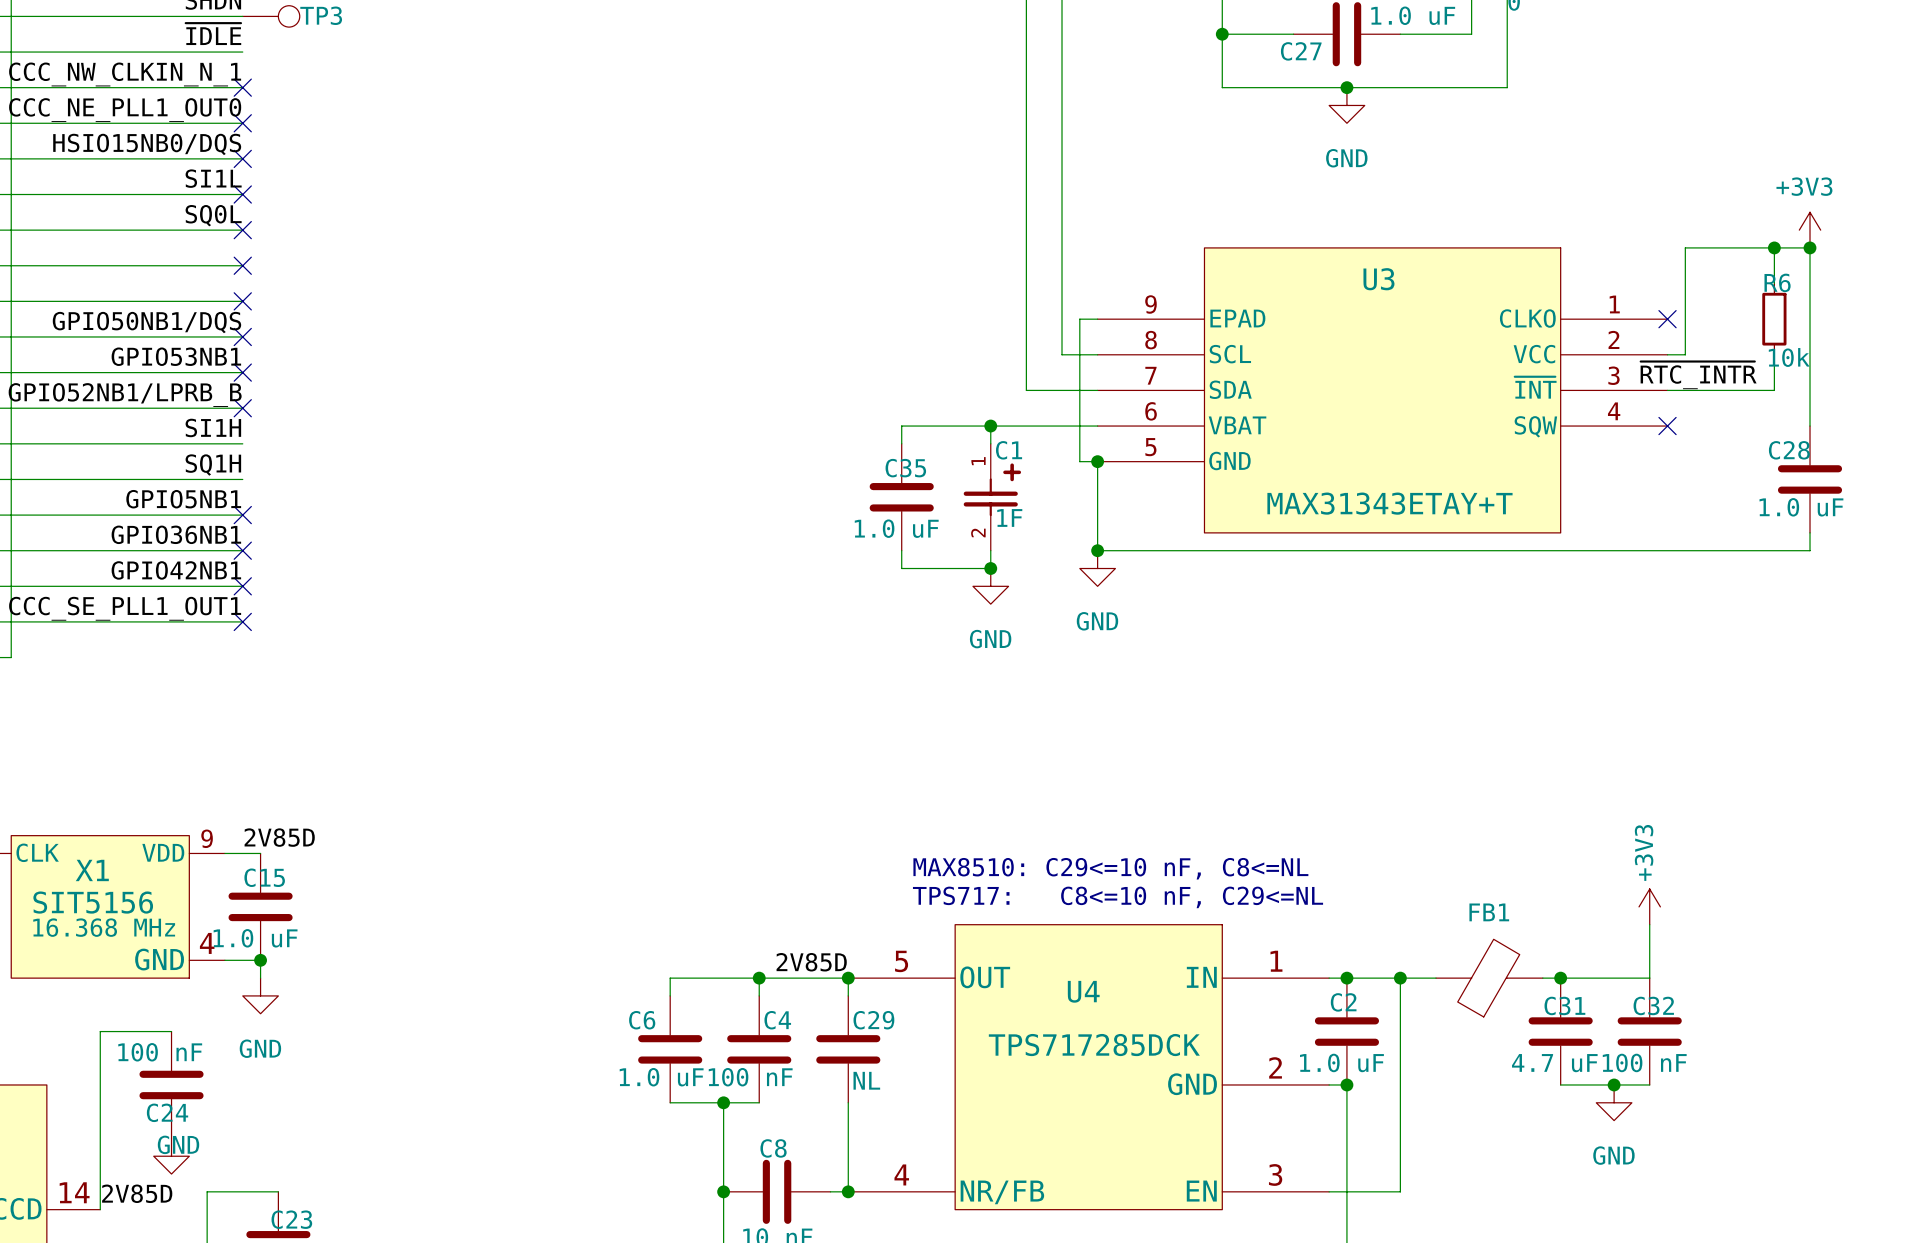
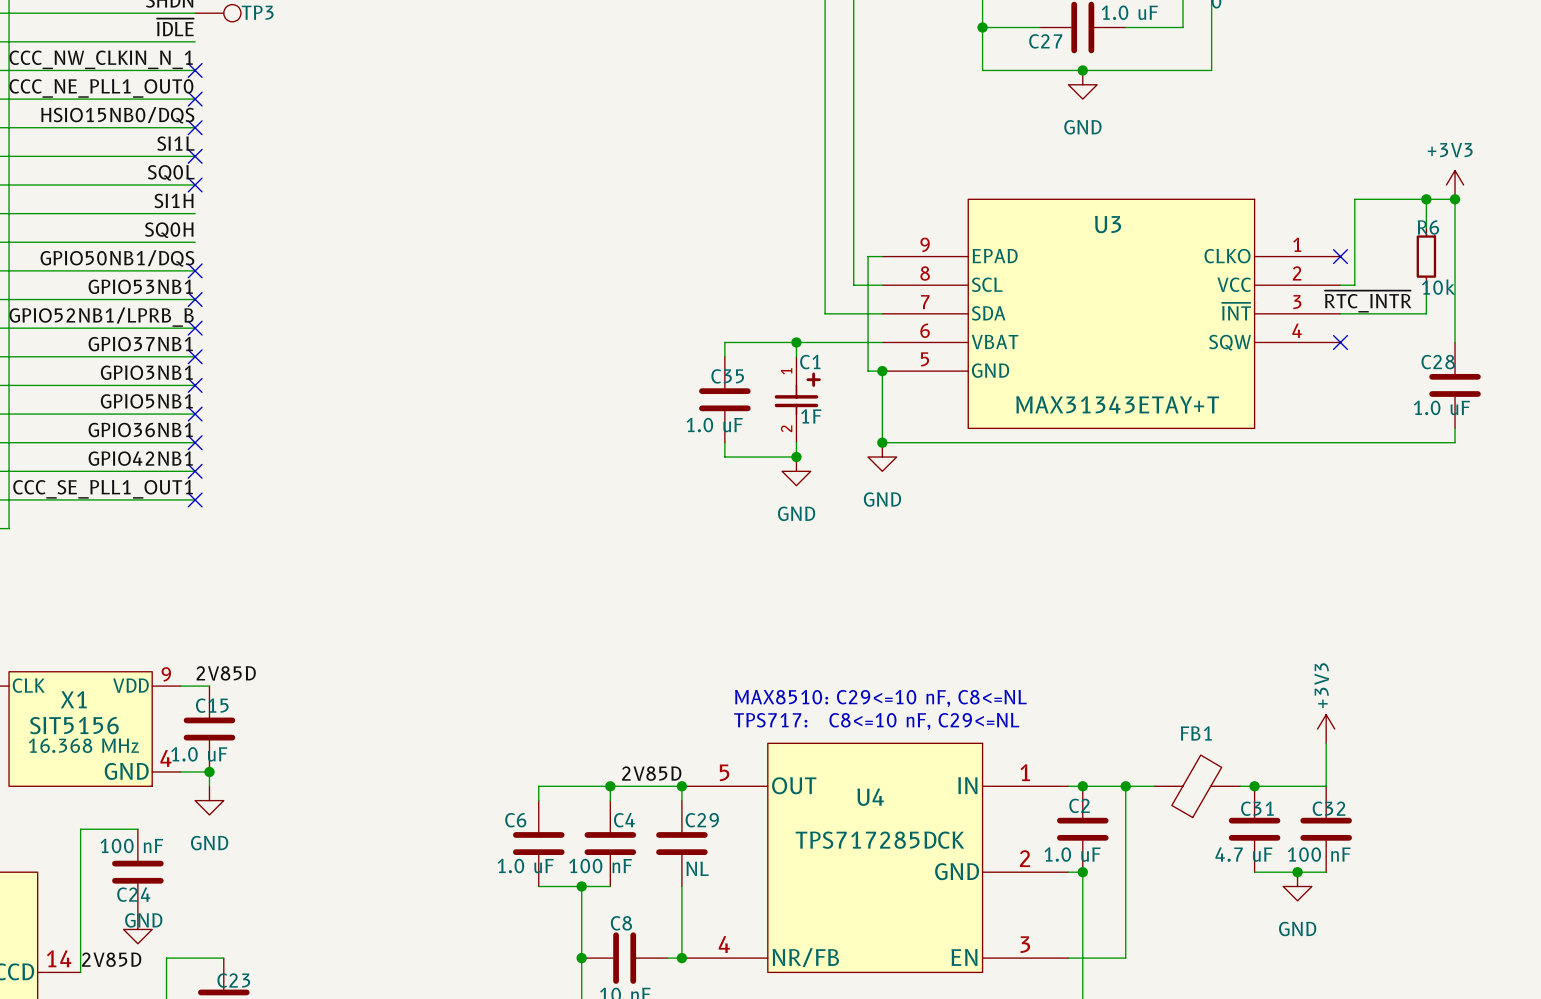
label: none -> SI1H (173, 200)
no-connect mark: (242, 265) -> none
label: none -> SQ0H (169, 230)
no-connect mark: (242, 301) -> none
label: SI1H (213, 427) -> GPIO37NB1 (140, 344)
no-connect mark: none -> (195, 356)
label: SQ1H (213, 465) -> GPIO3NB1 (146, 372)
no-connect mark: none -> (195, 385)

